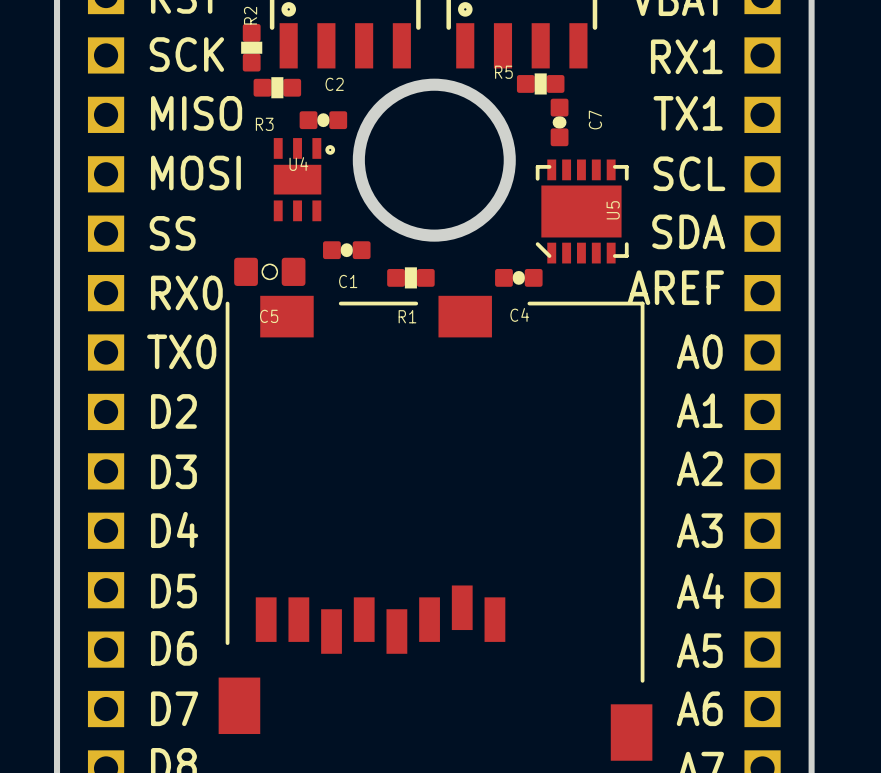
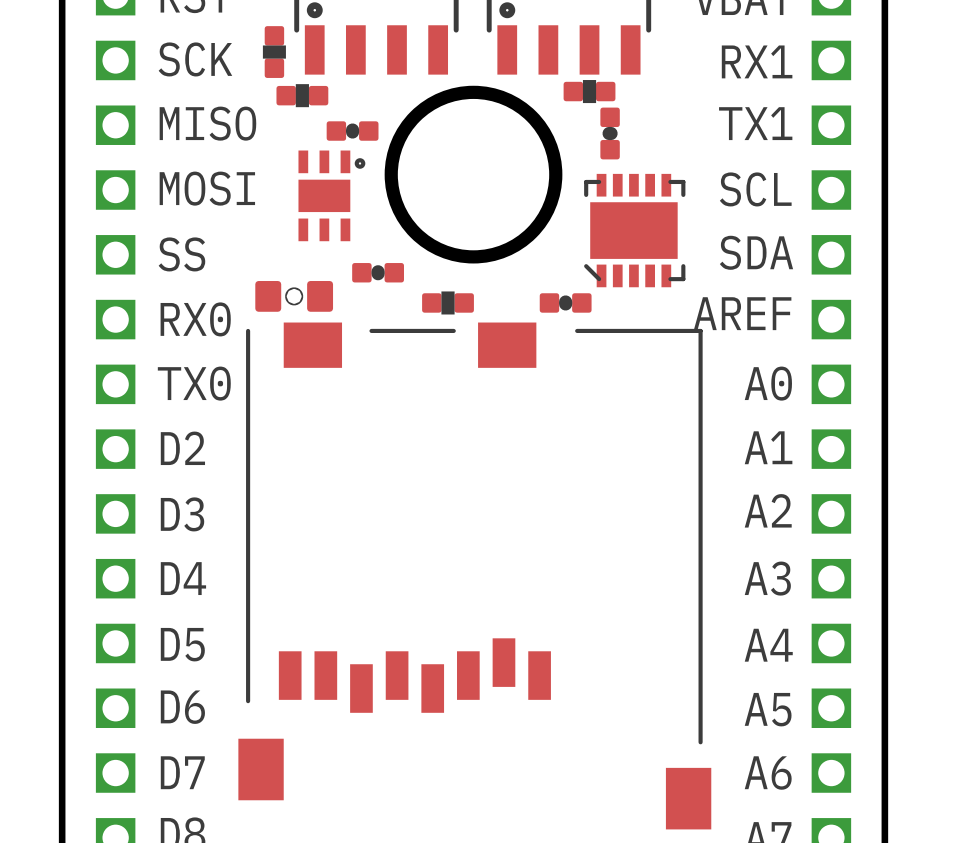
R2 name: R2 (250, 15) -> none
R5 name: R5 (503, 72) -> none
C2 name: C2 (334, 84) -> none
C7 name: C7 (595, 119) -> none
R3 name: R3 (264, 124) -> none
U4 name: U4 (298, 164) -> none
U5 name: U5 (613, 210) -> none
C1 name: C1 (348, 281) -> none
C4 name: C4 (519, 314) -> none
C5 name: C5 (269, 316) -> none
R1 name: R1 (407, 316) -> none

